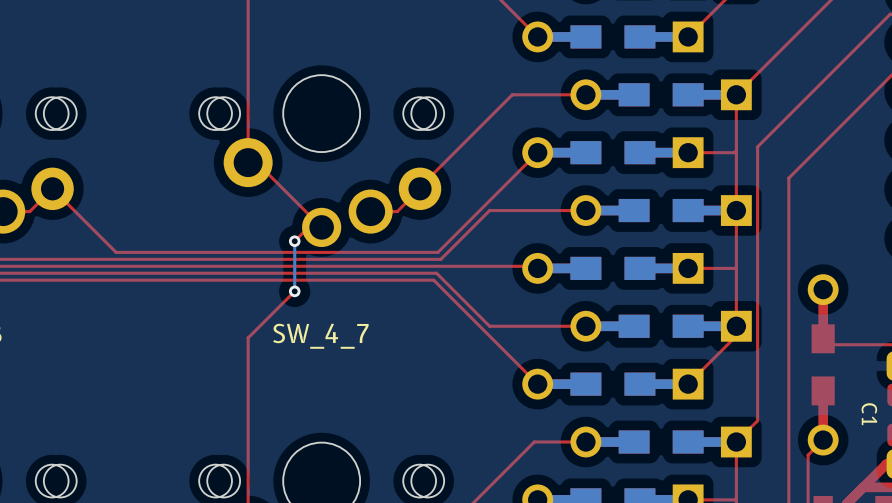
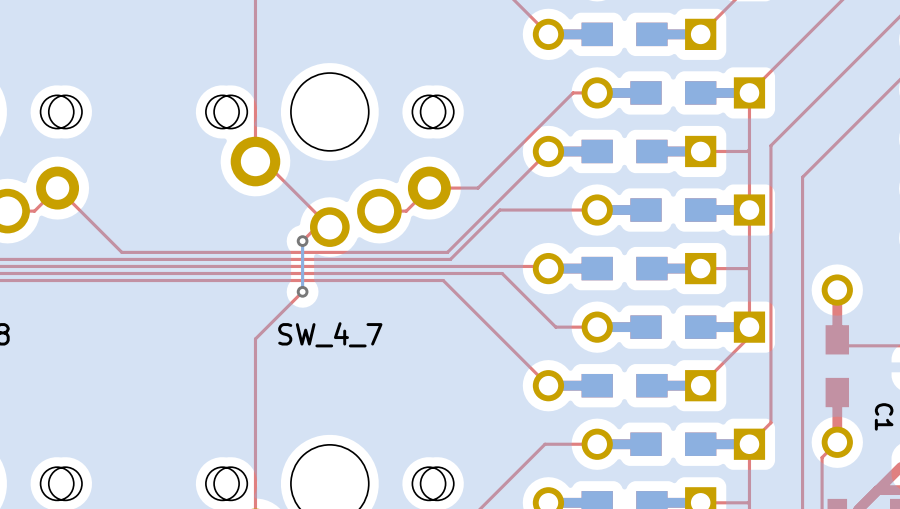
top track: (562, 94) (512, 94) (420, 188) -> (573, 92) (477, 188) (429, 188)
top track: (436, 273) (489, 326) (544, 326) -> (446, 273) (502, 273) (555, 327)

